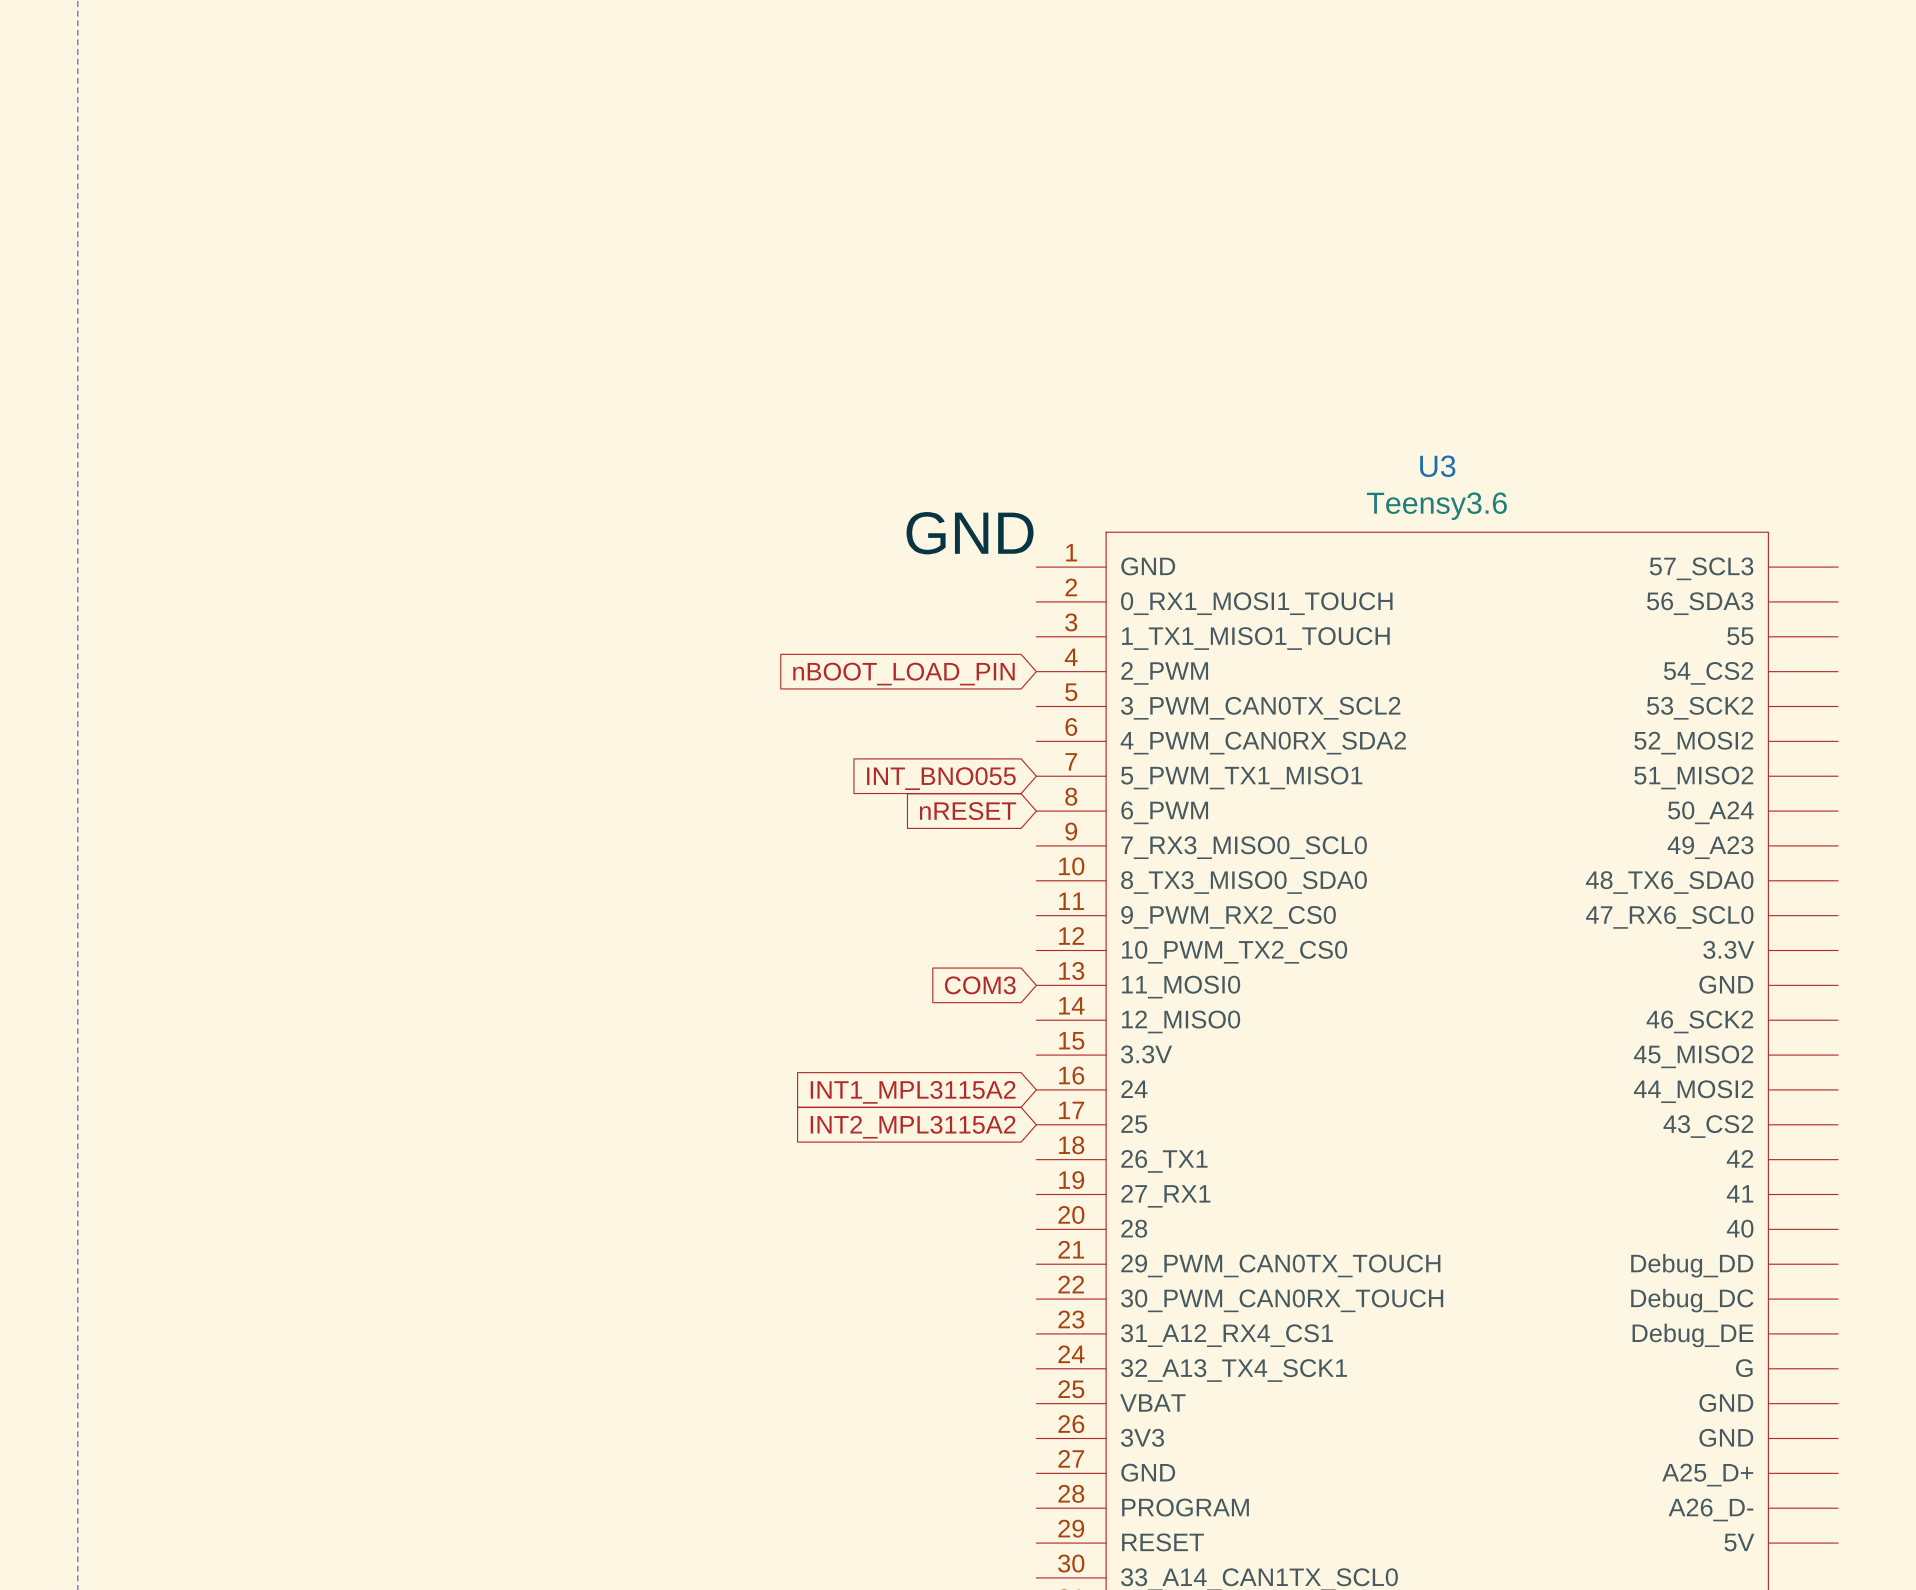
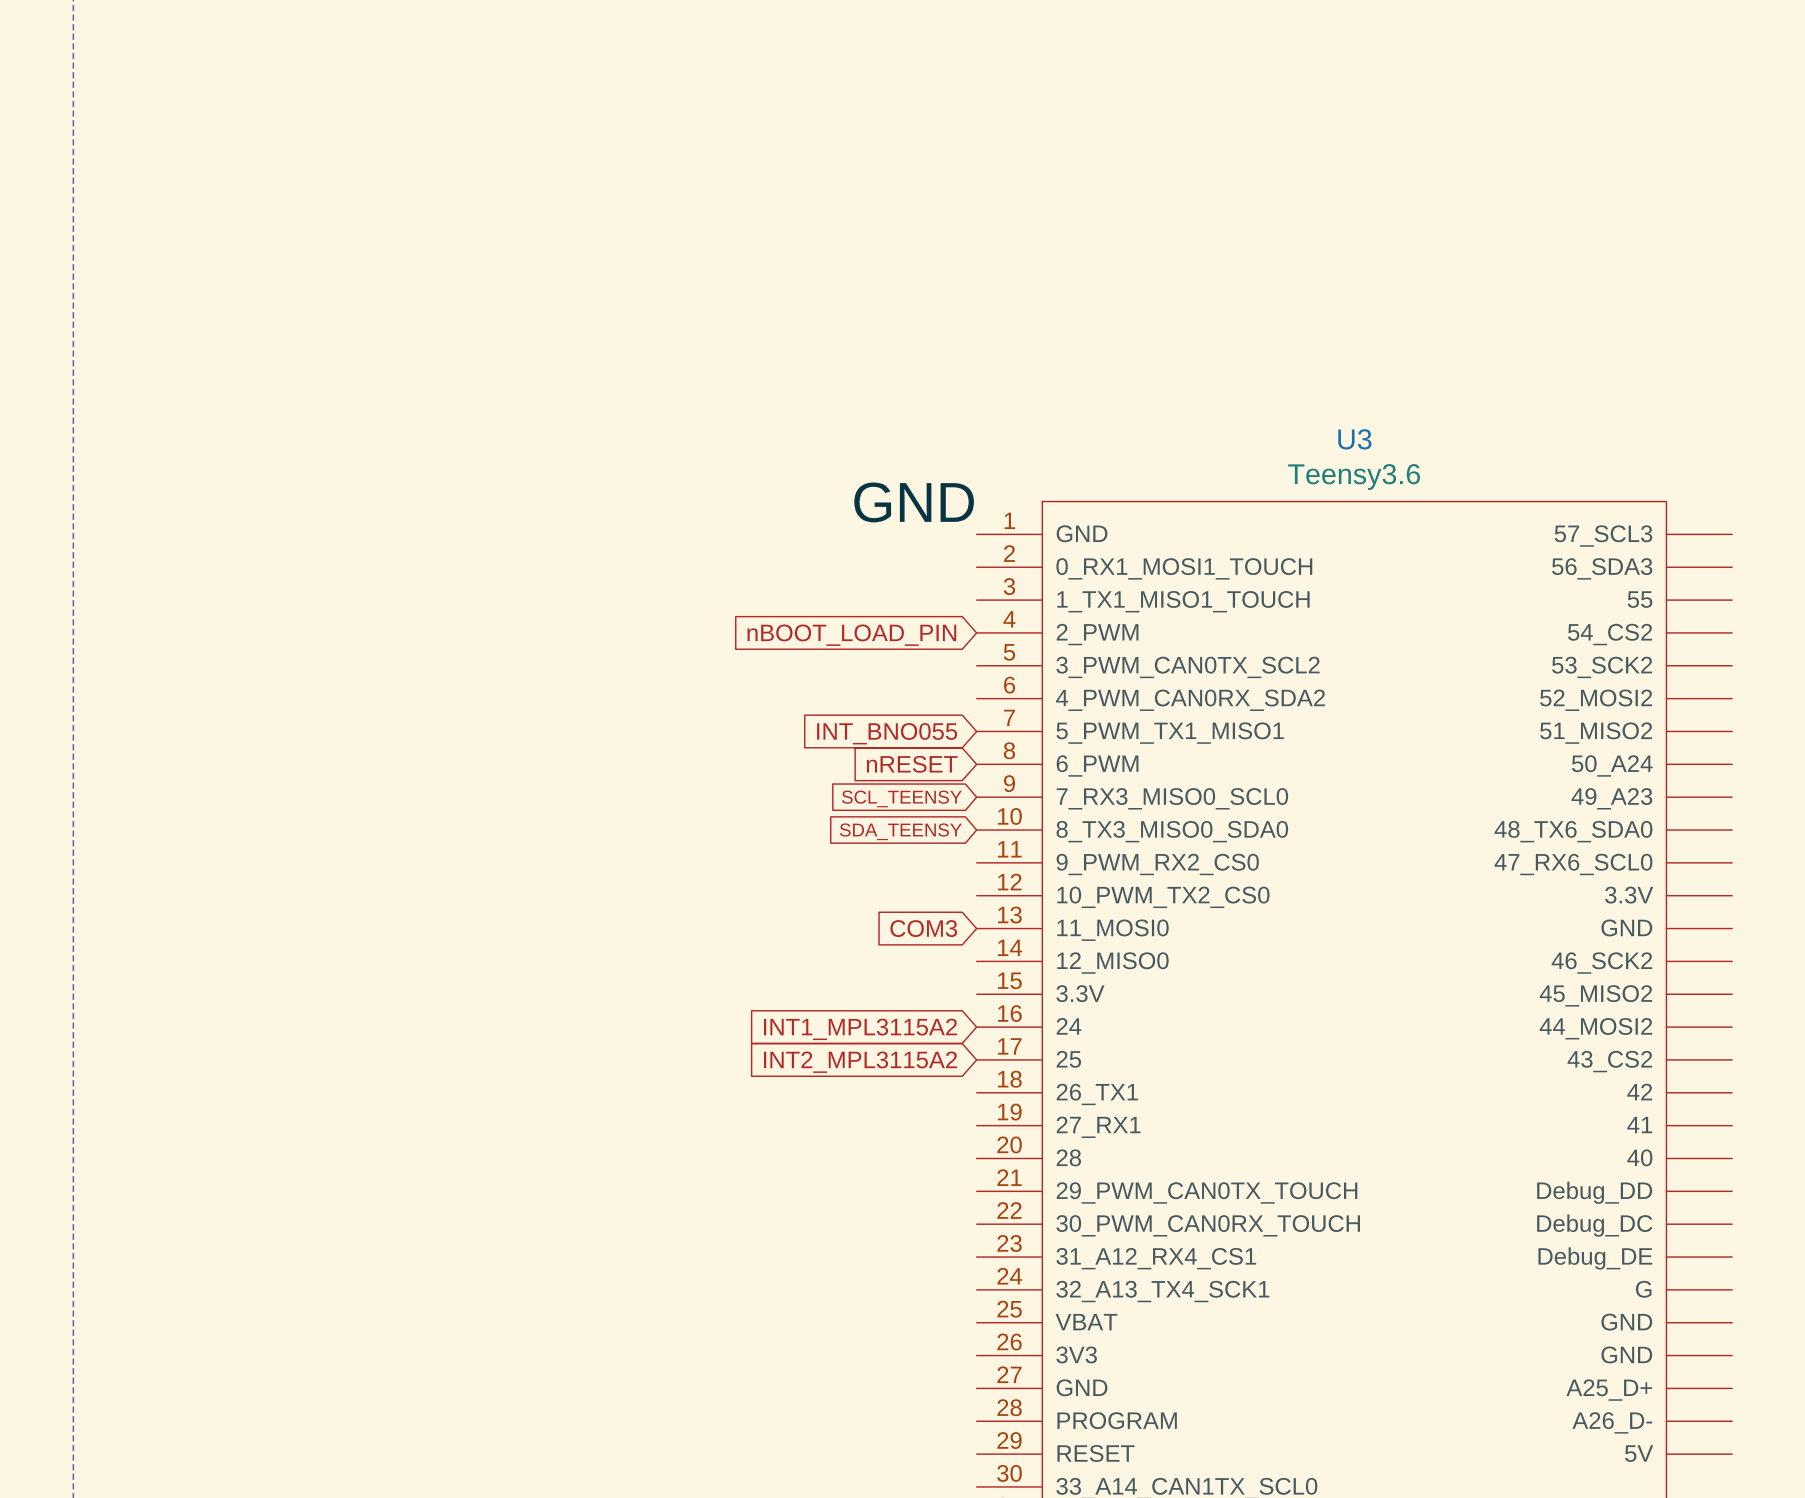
global label: none -> SCL_TEENSY (901, 798)
global label: none -> SDA_TEENSY (900, 831)

